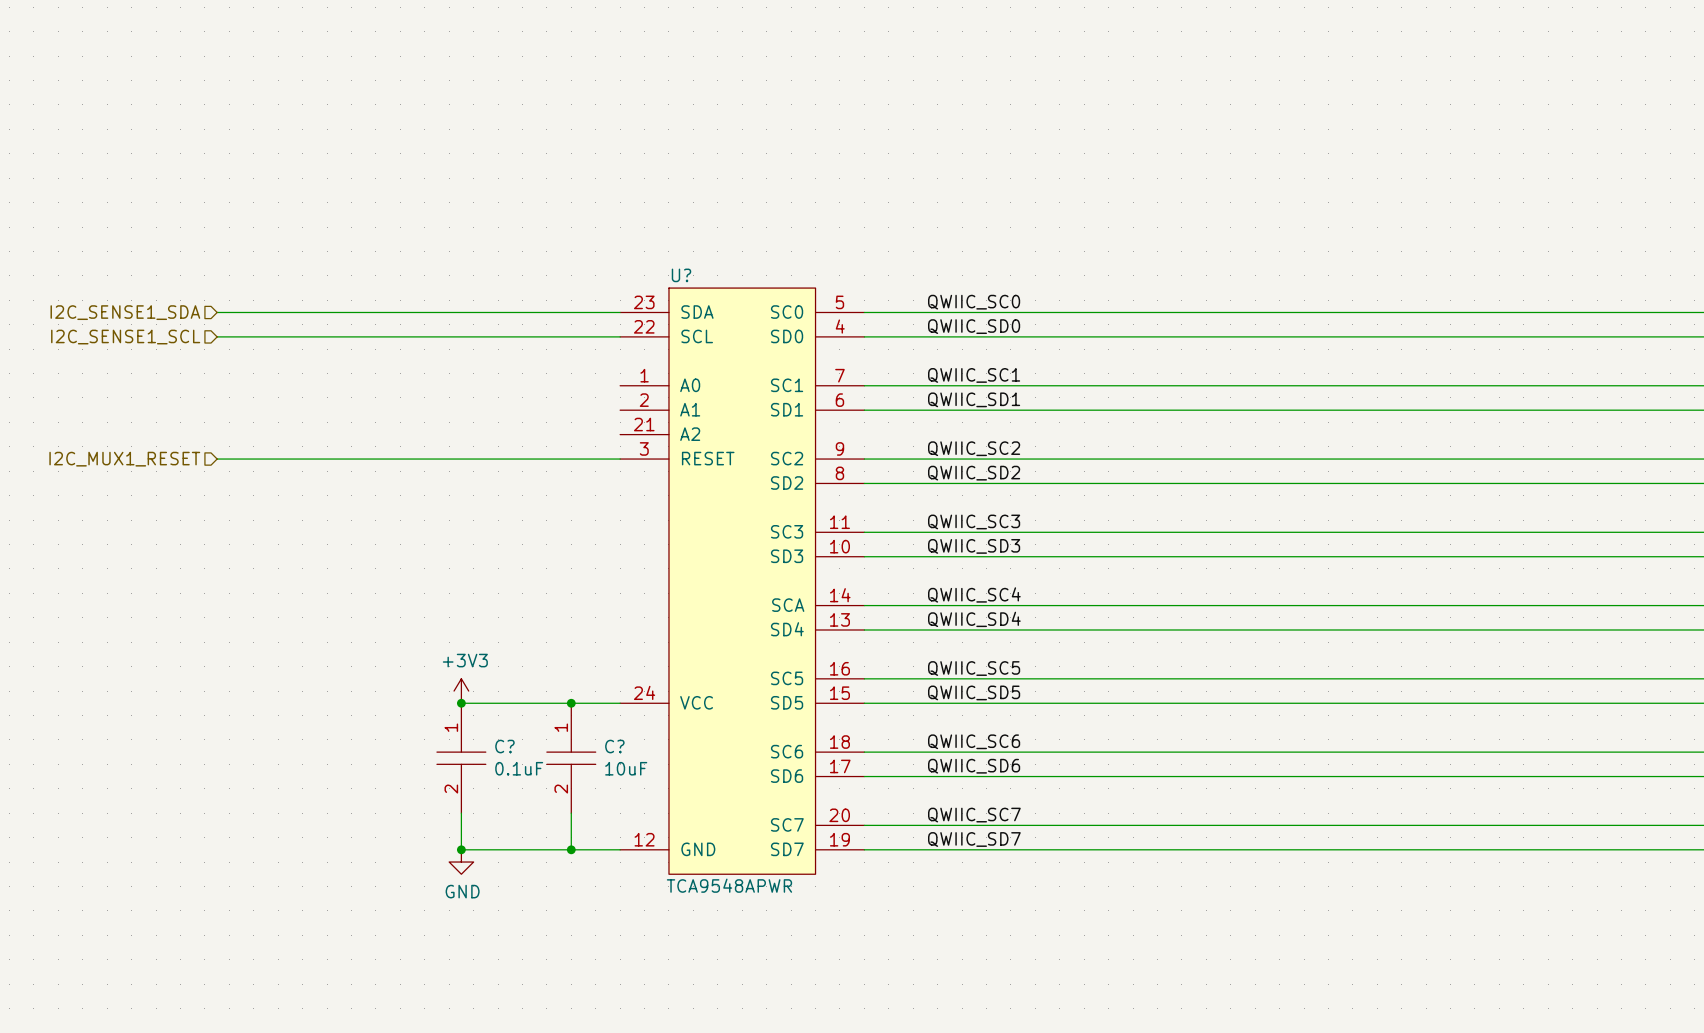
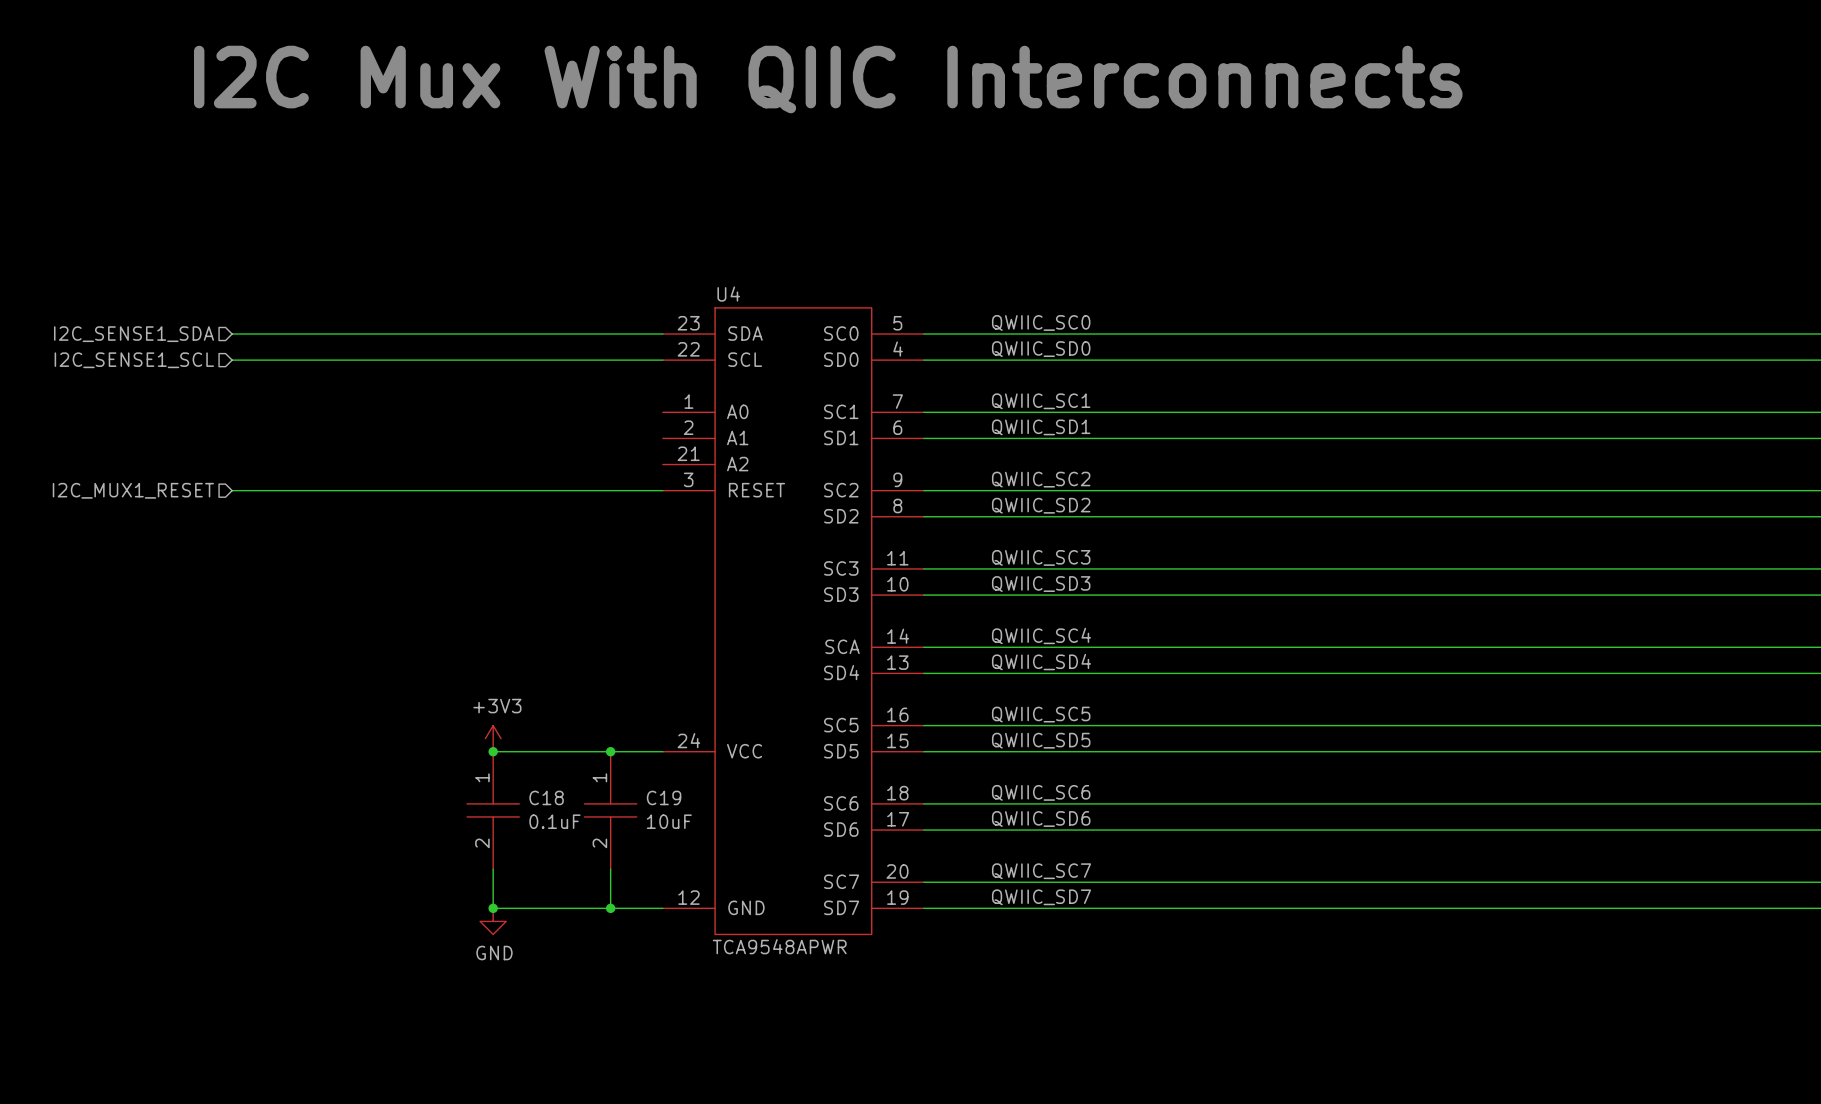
text: none -> I2C Mux With QIIC Interconnects (828, 79)
U? name: U? (681, 275) -> U4 (728, 294)
C? name: C? (504, 746) -> C18 (546, 797)
C? name: C? (614, 746) -> C19 (664, 797)

